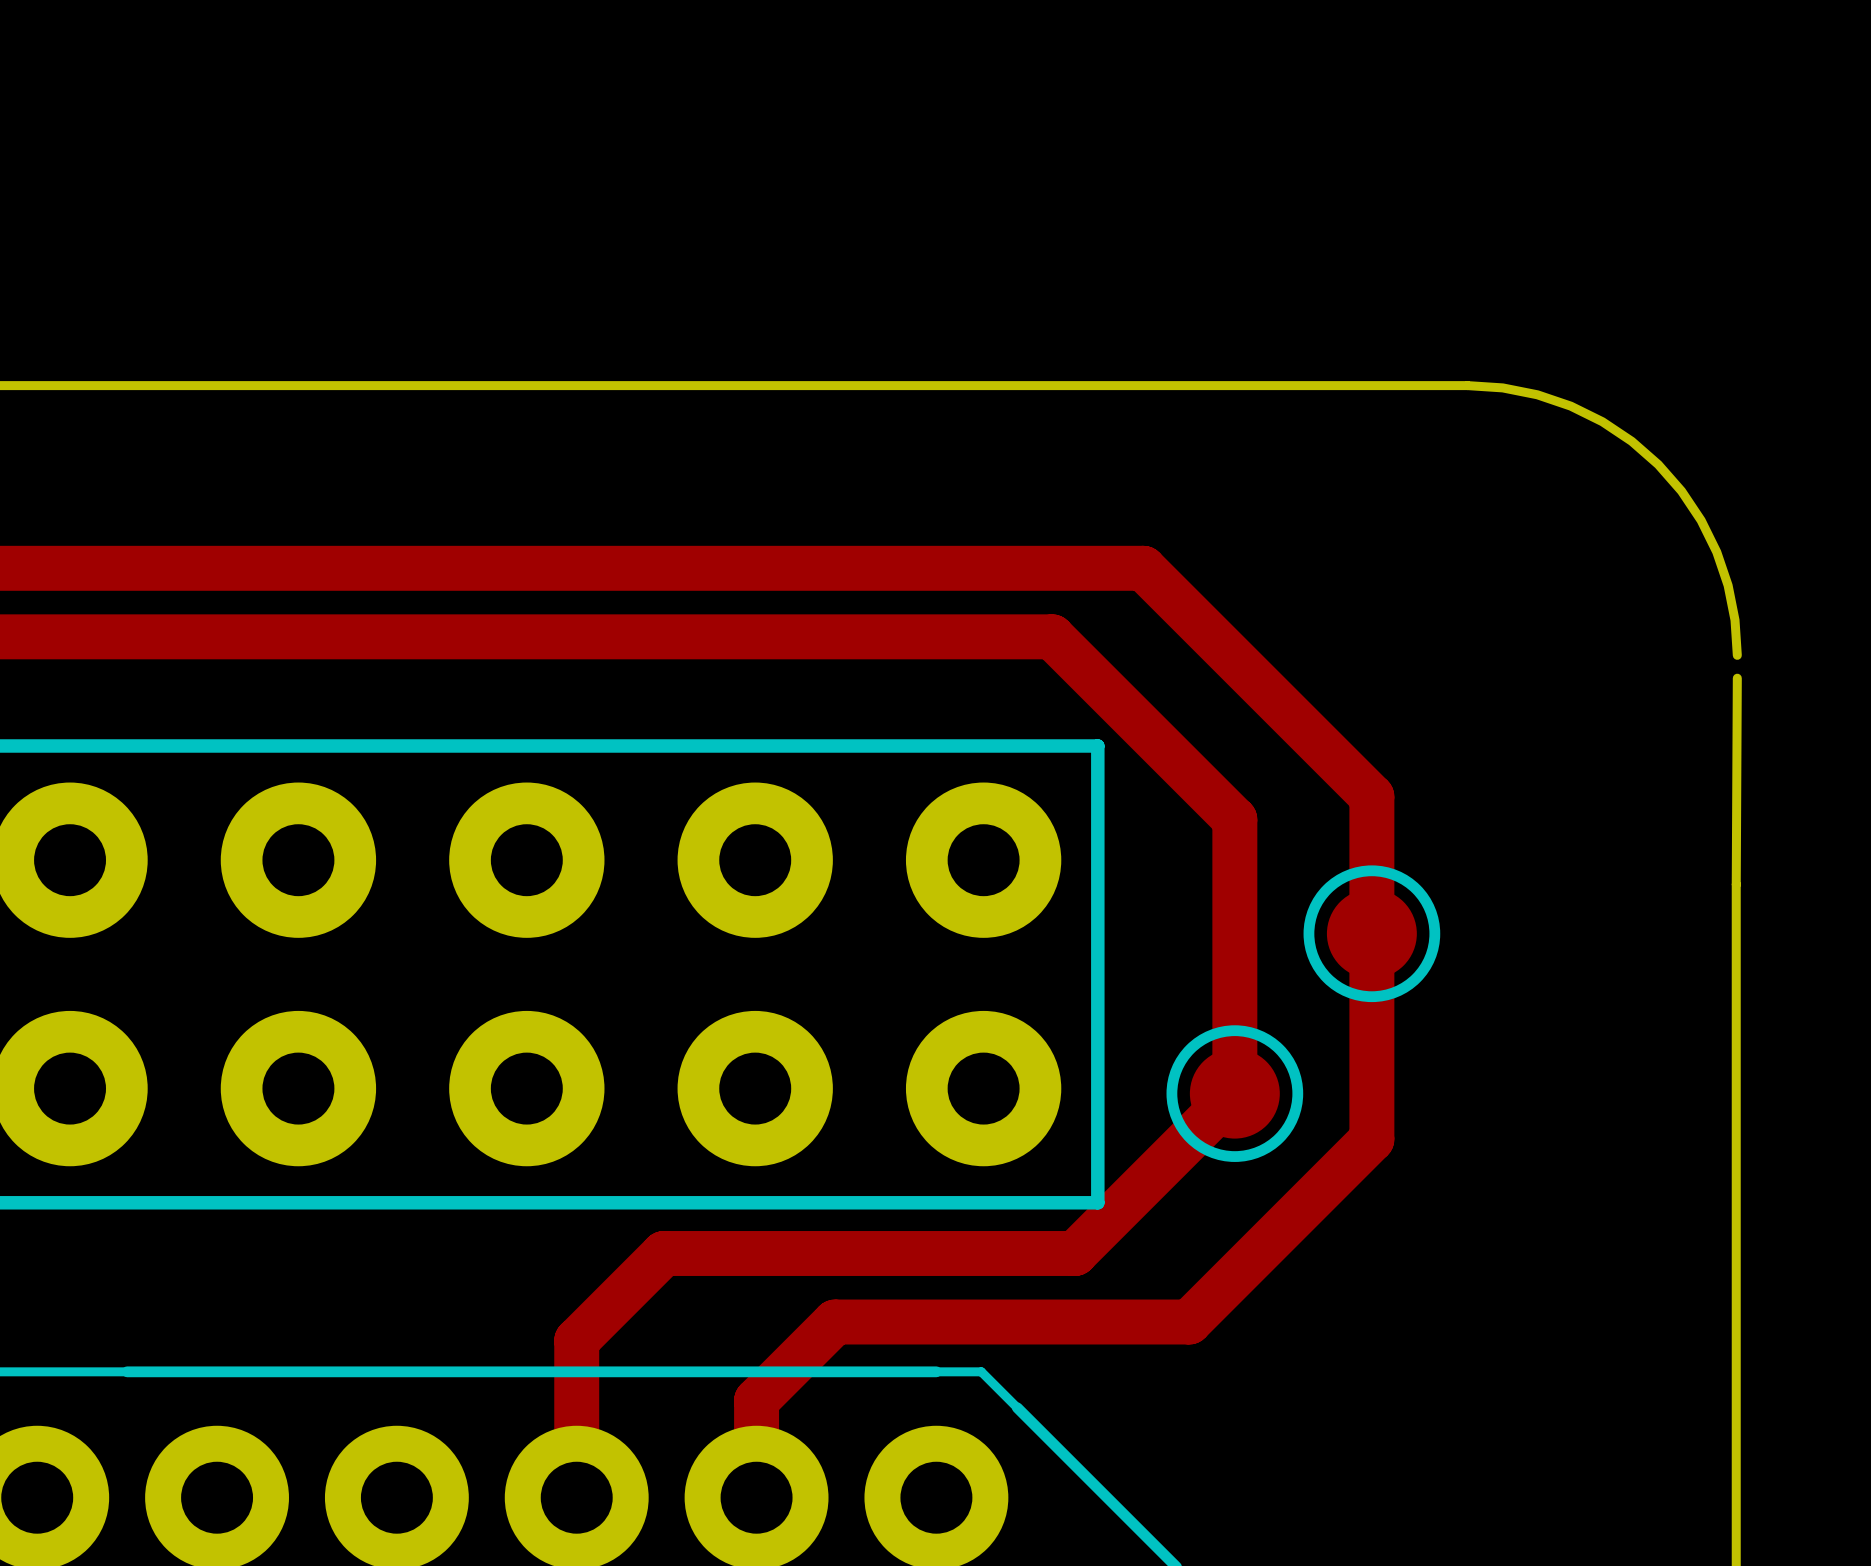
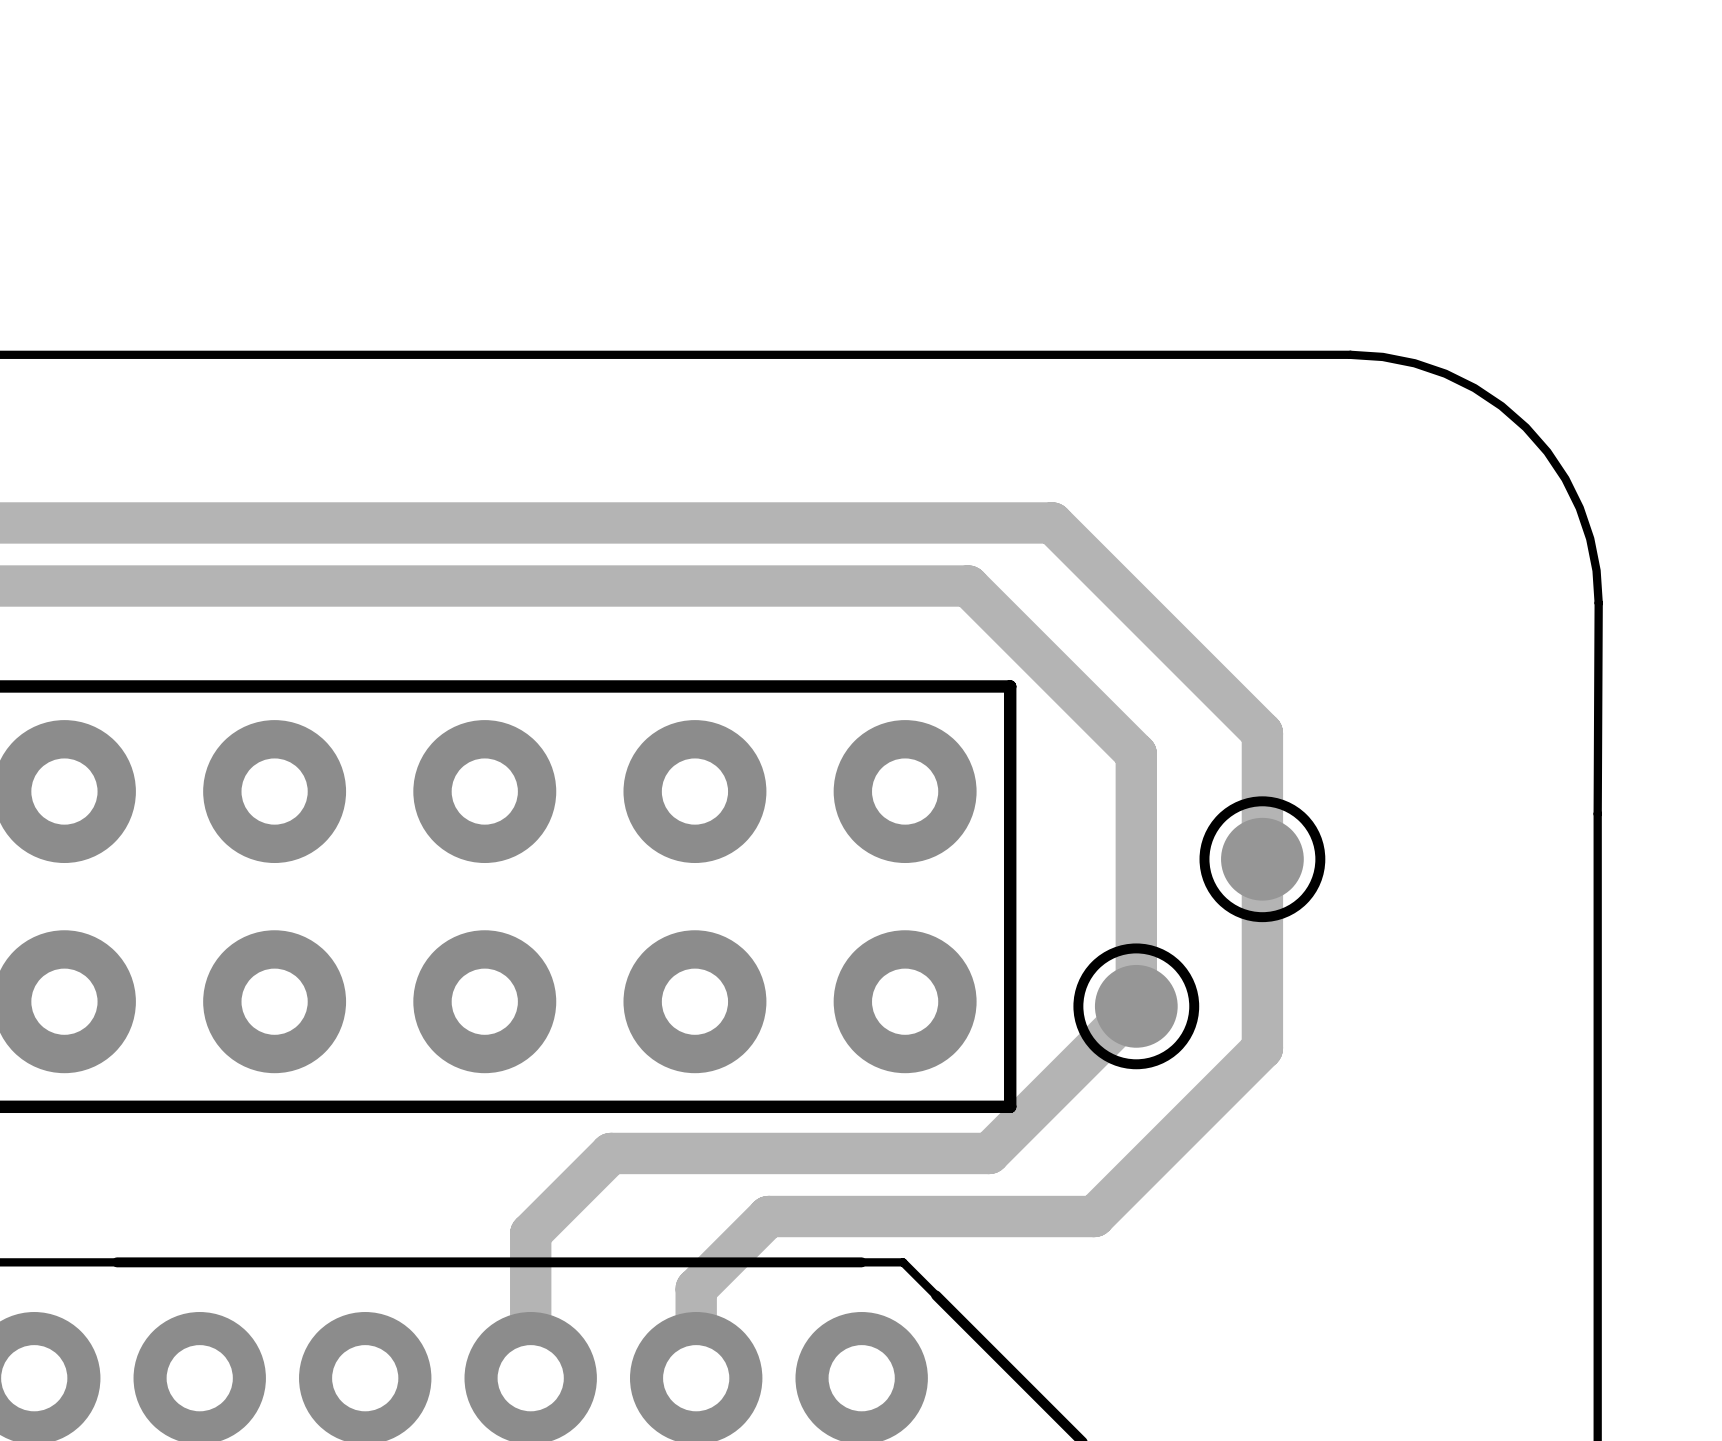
board edge: (1737, 678) (1736, 884) -> (1598, 603) (1597, 813)

